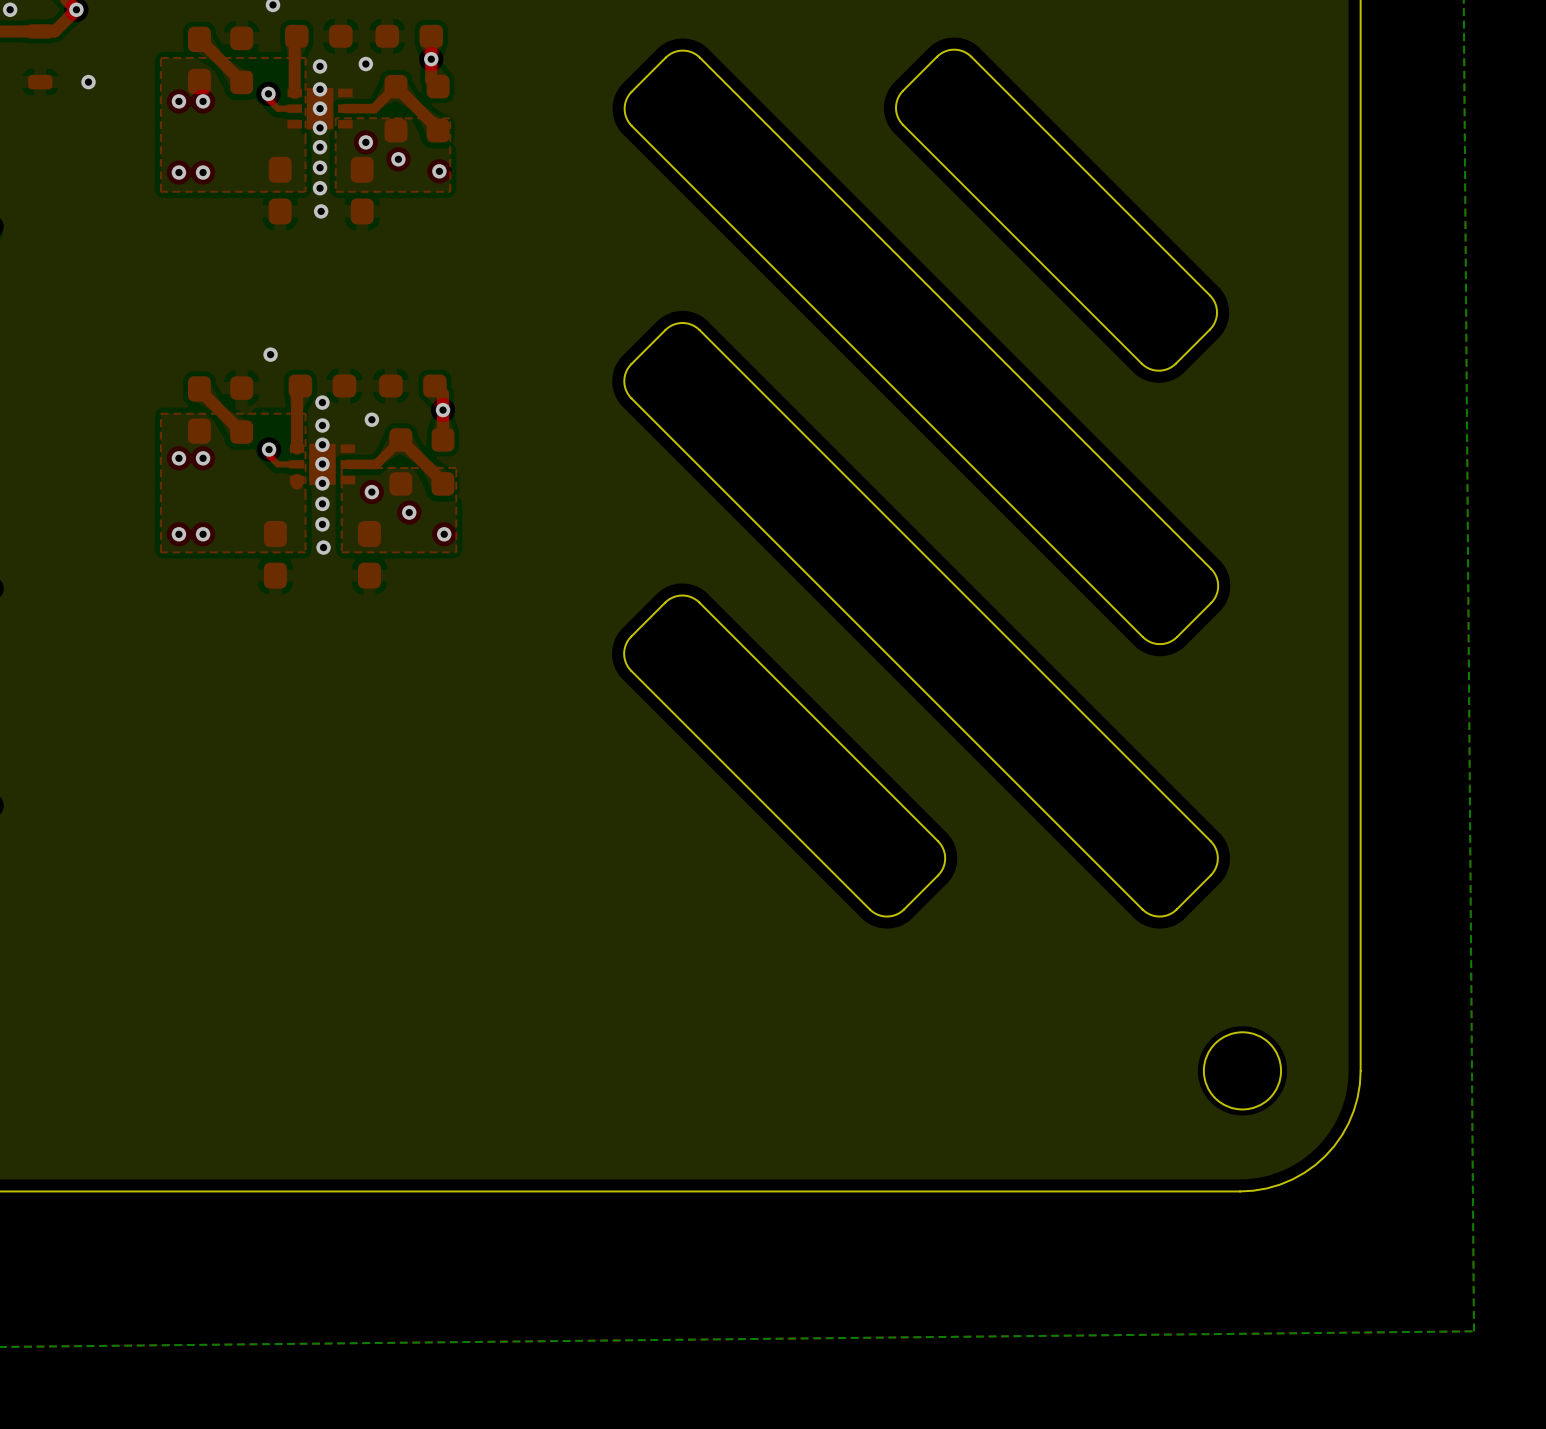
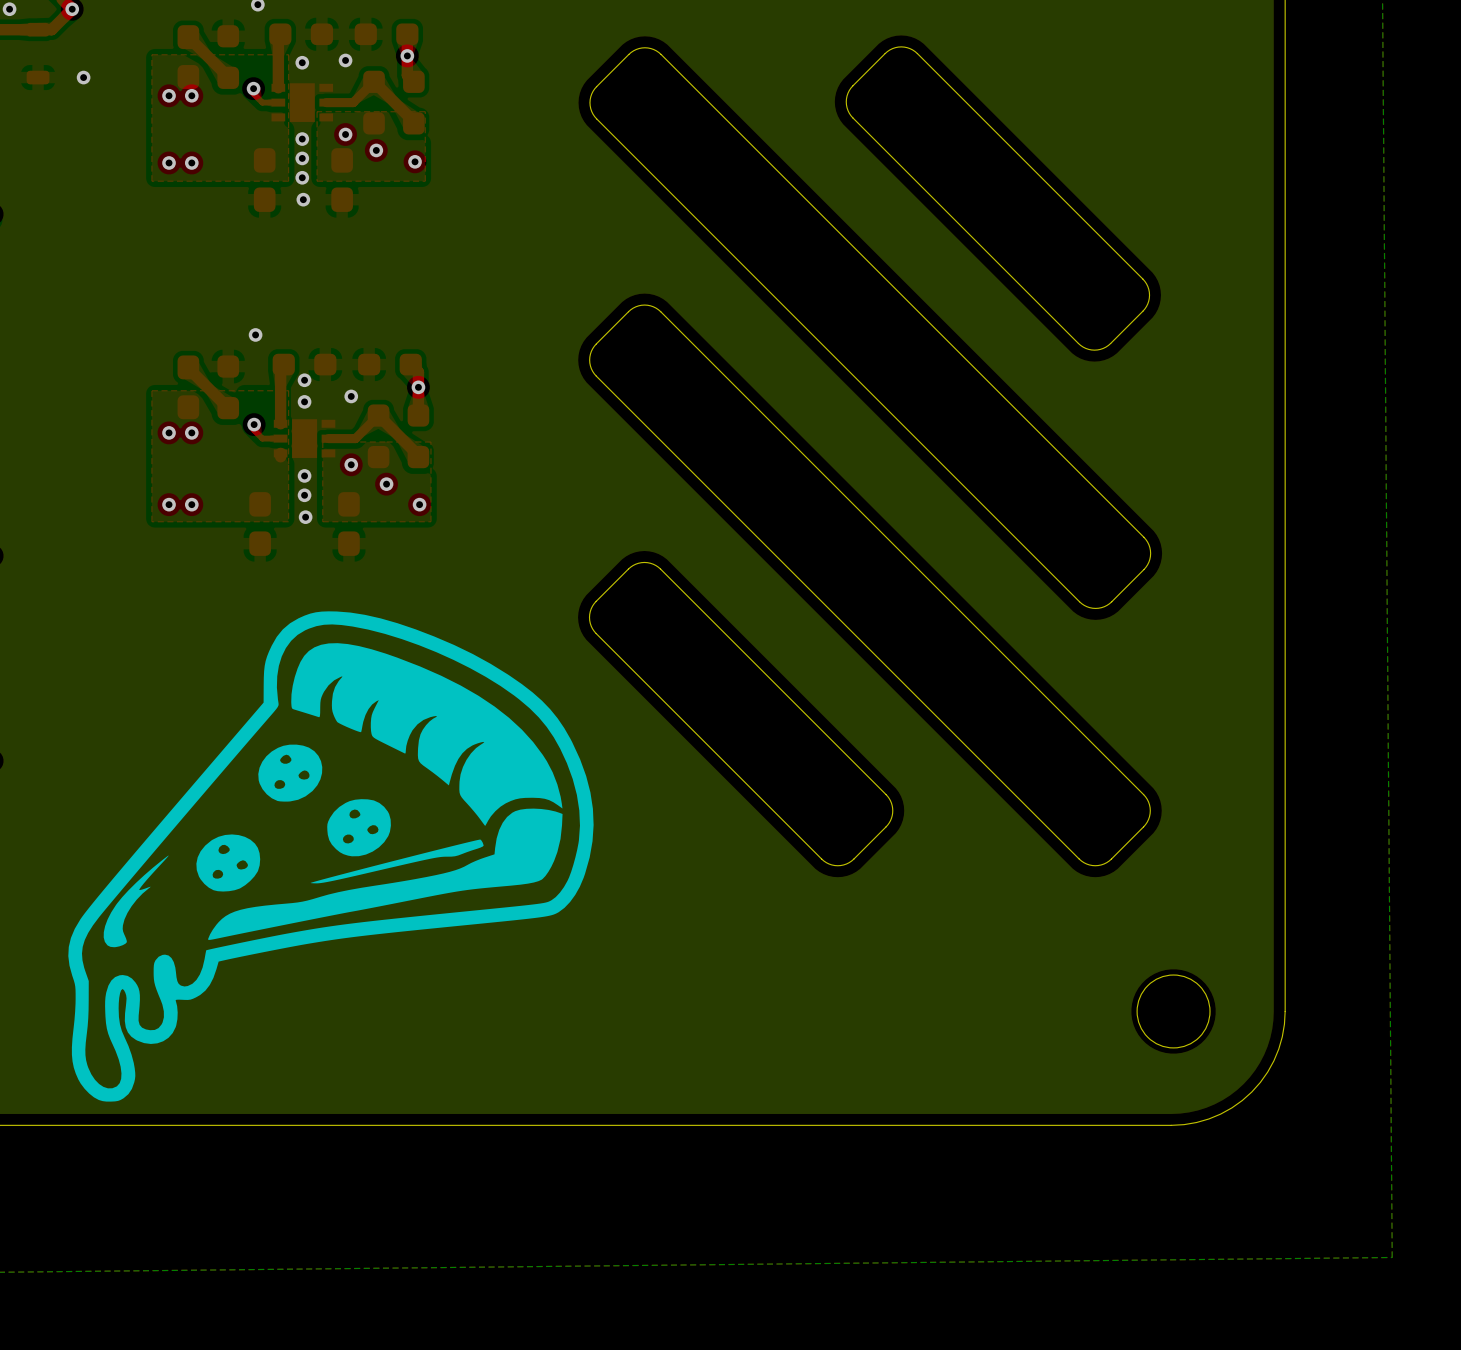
via: (320, 89) -> none
via: (320, 108) -> none
via: (320, 127) -> none
via: (322, 444) -> none
via: (322, 464) -> none
via: (322, 483) -> none
drawing: none -> [68, 611, 594, 1102]

